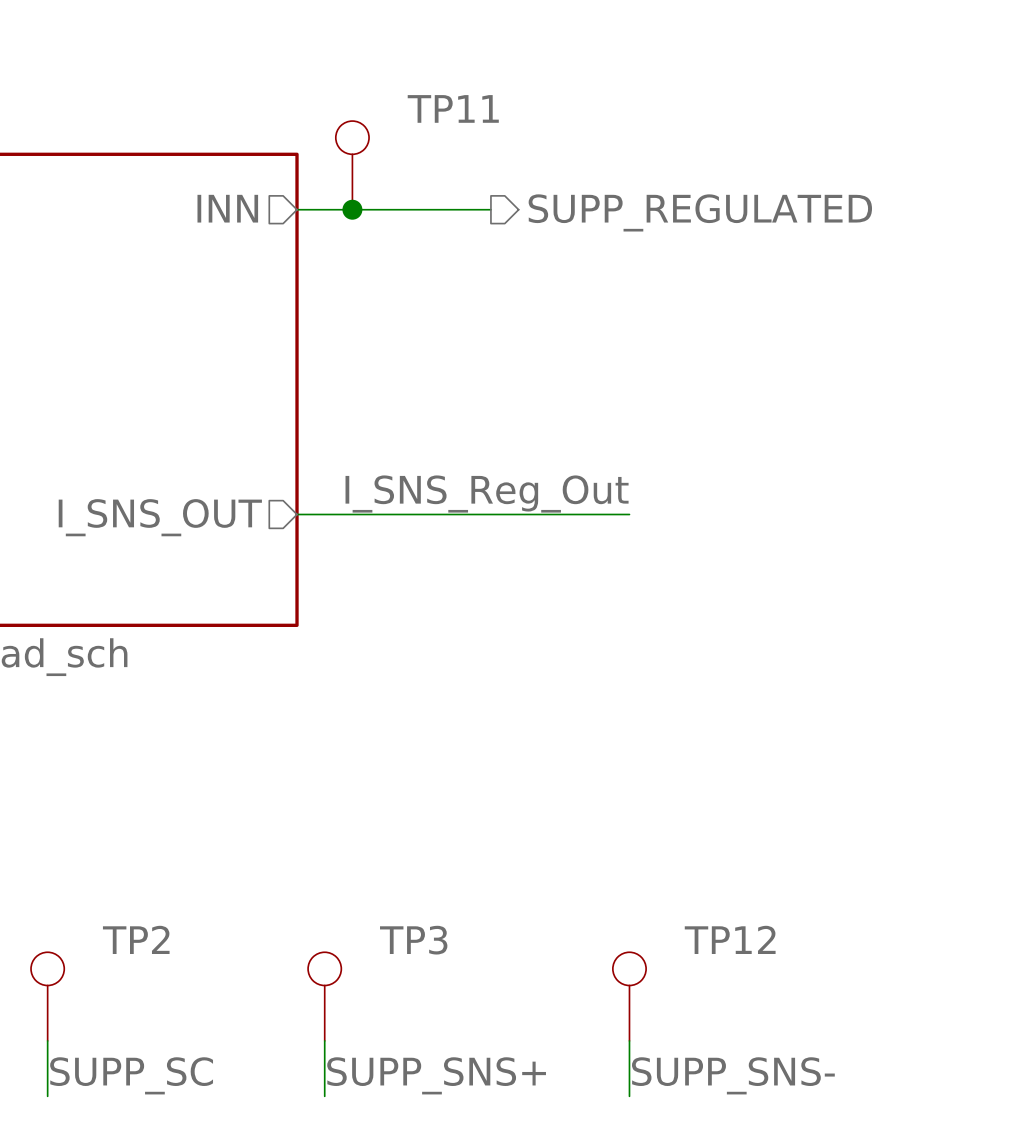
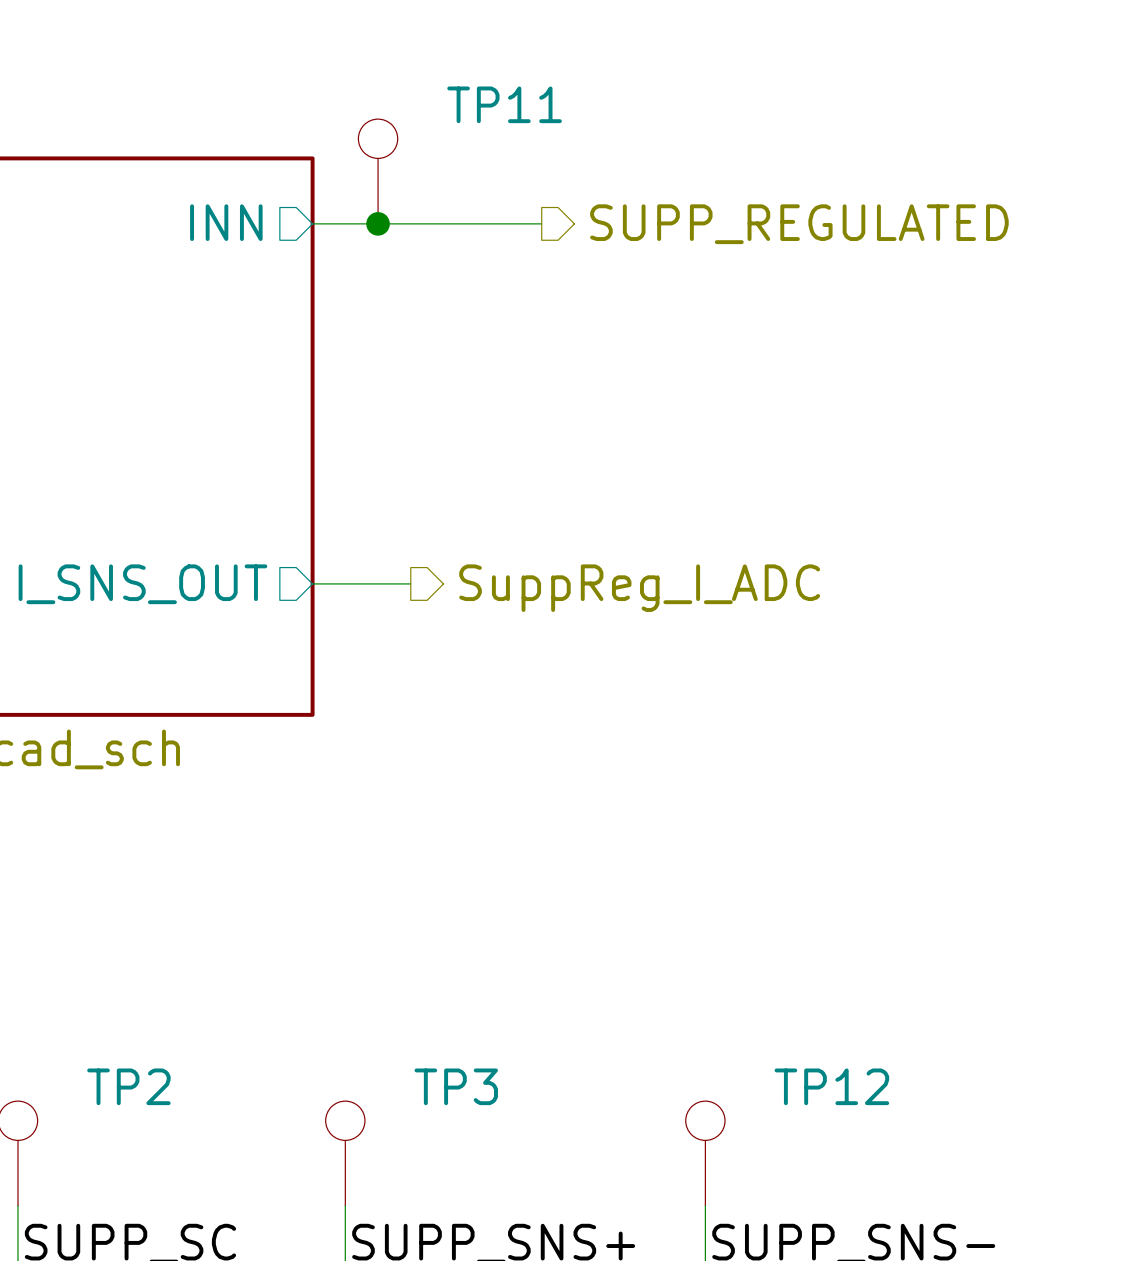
label: I_SNS_Reg_Out (487, 494) -> none
wire: (380, 514) (629, 514) -> none
hierarchical label: none -> SuppReg_I_ADC (639, 588)

